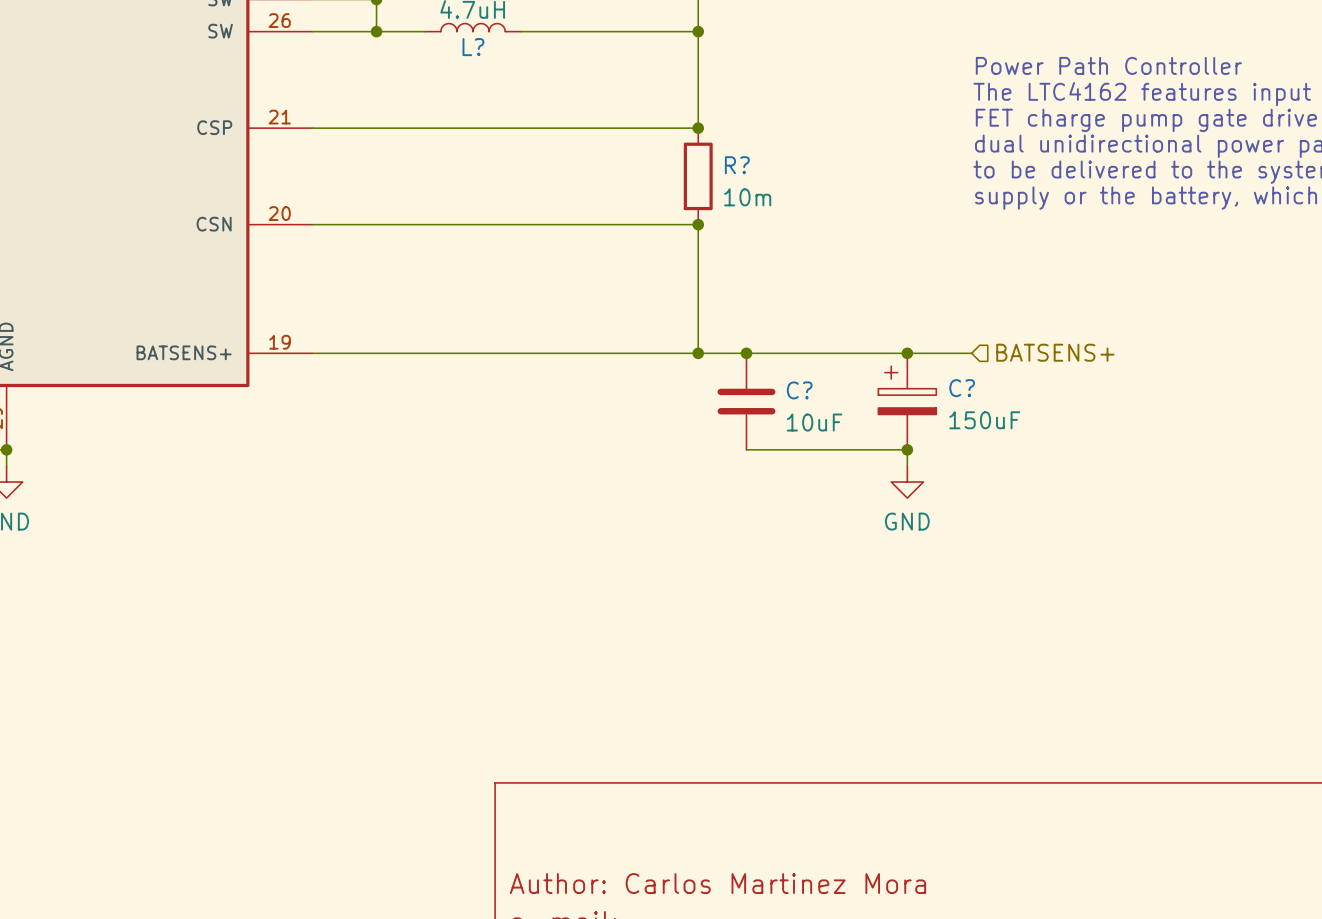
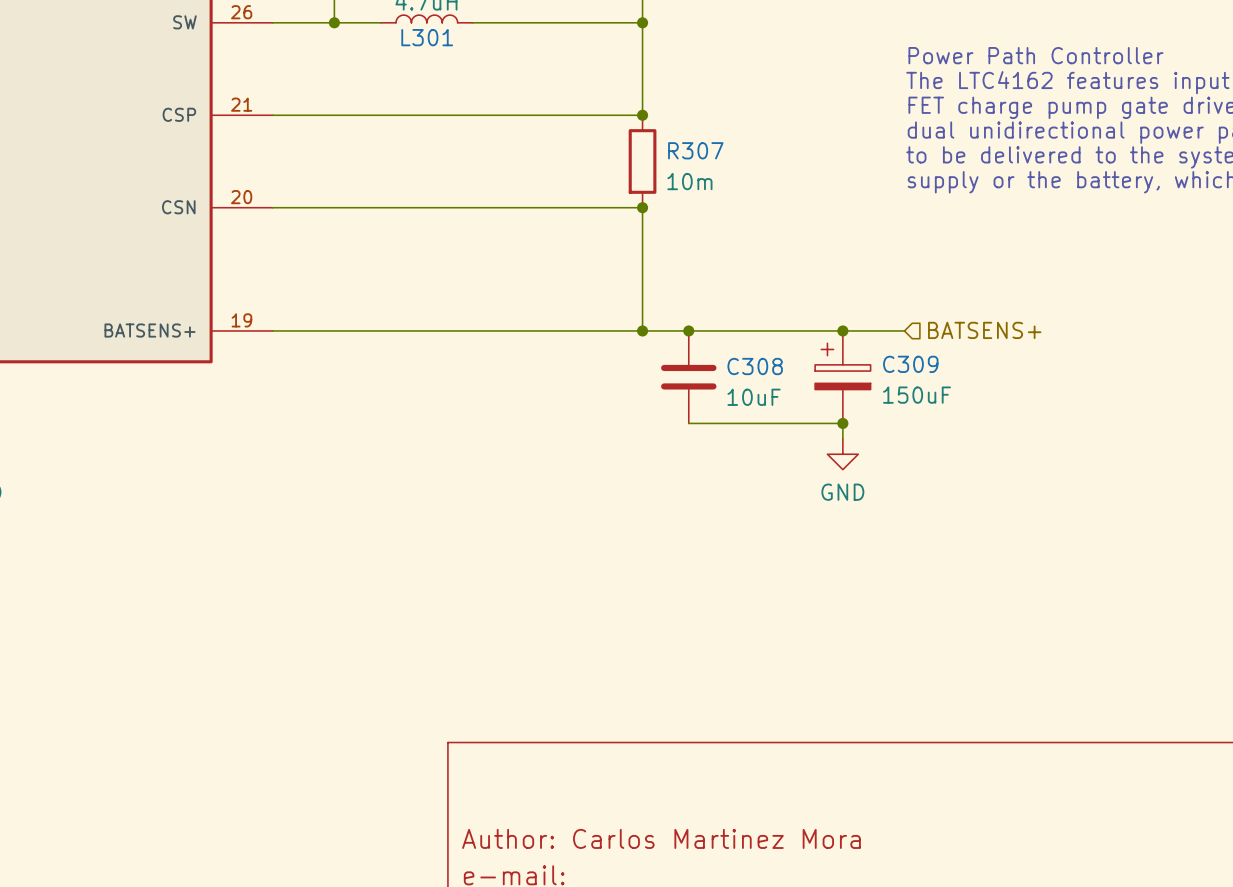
L? name: L? (473, 47) -> L301 (427, 37)
R? name: R? (737, 165) -> R307 (695, 150)
C? name: C? (962, 388) -> C309 (910, 364)
C? name: C? (799, 390) -> C308 (755, 366)

